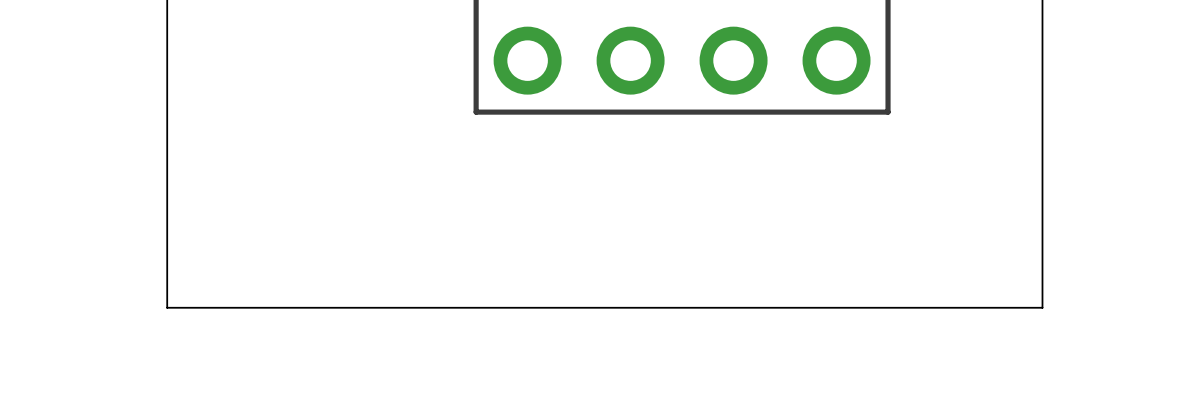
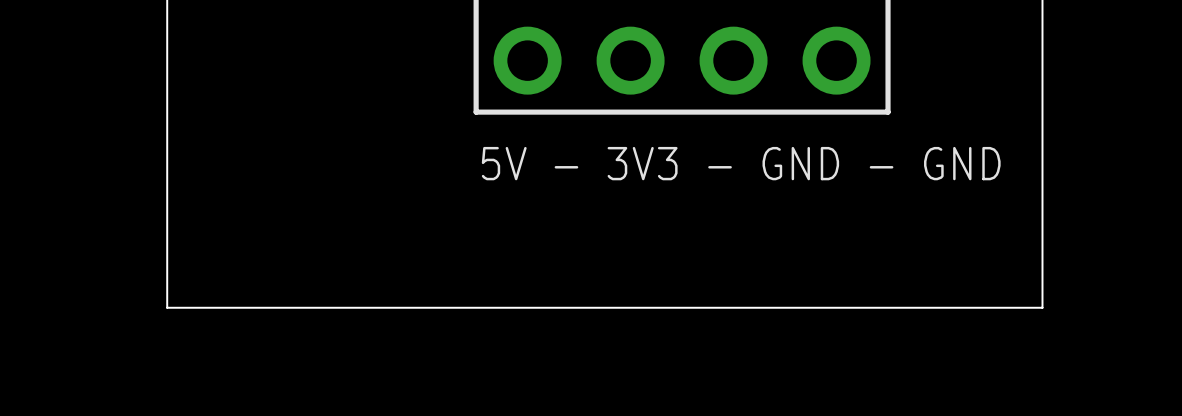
text: none -> 5V - 3V3 - GND - GND (741, 163)

